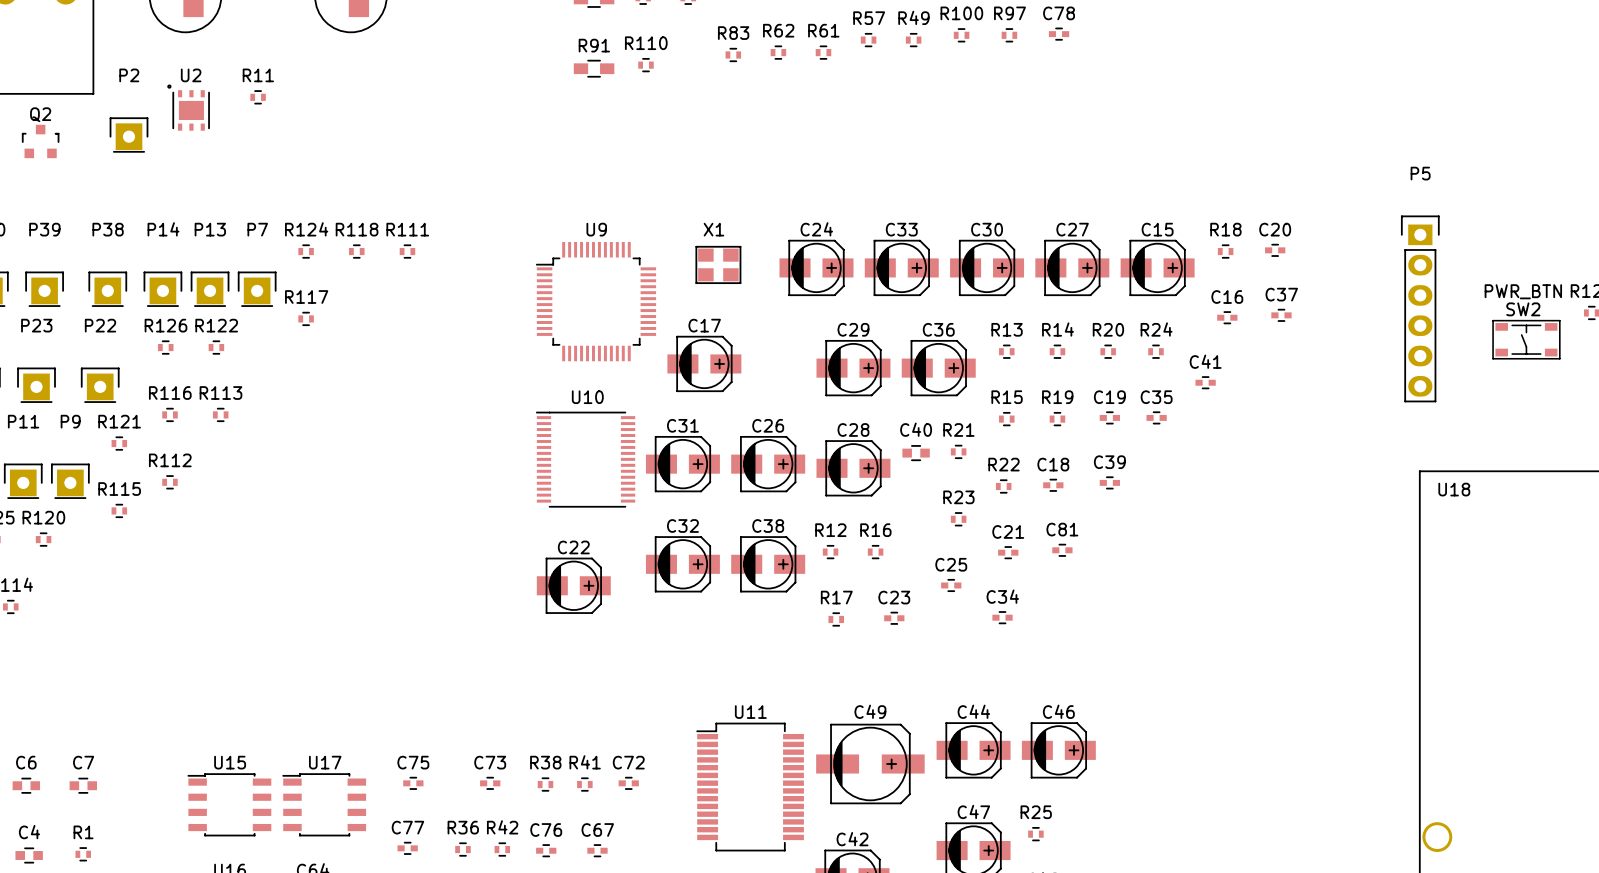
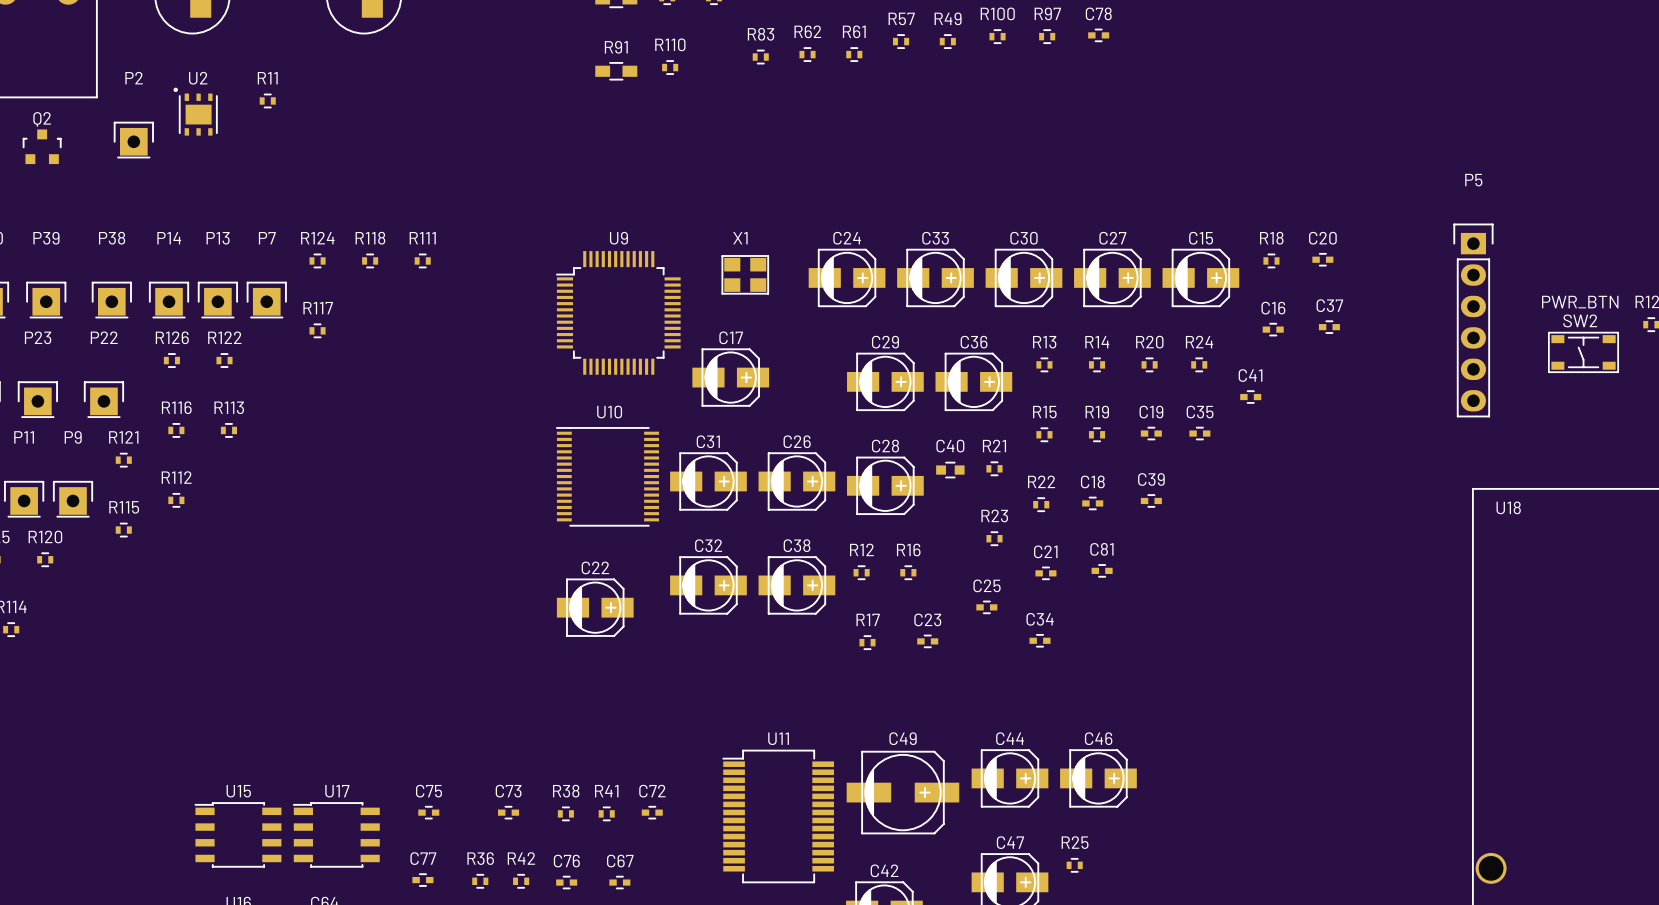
C6: (26, 785) -> none
C7: (83, 785) -> none
R1: (83, 854) -> none
C4: (29, 855) -> none

